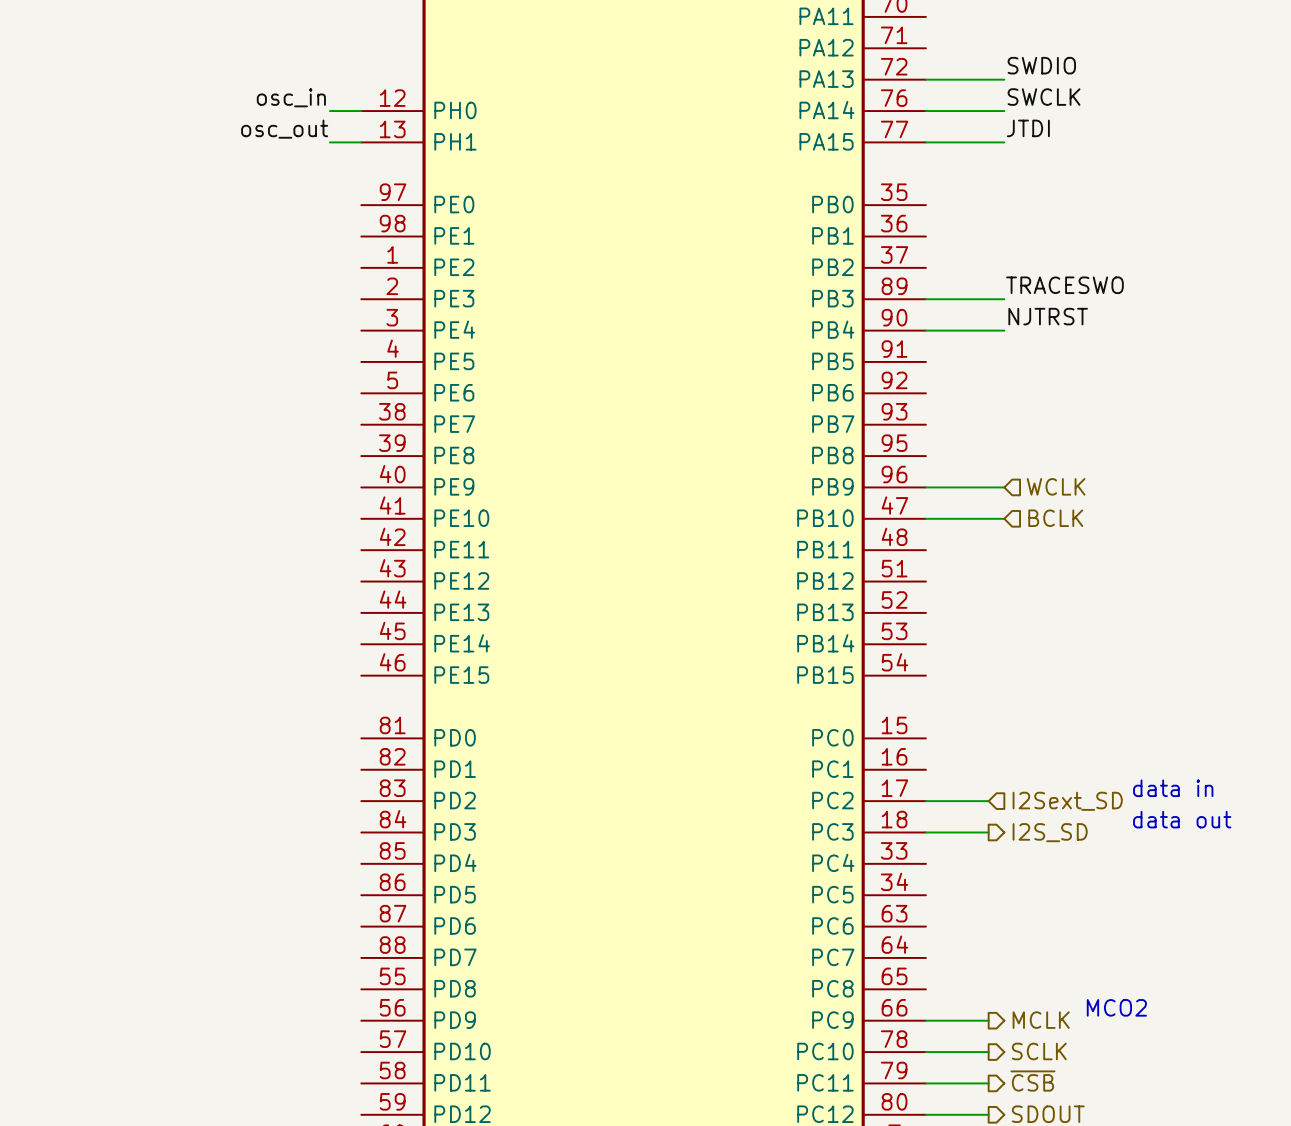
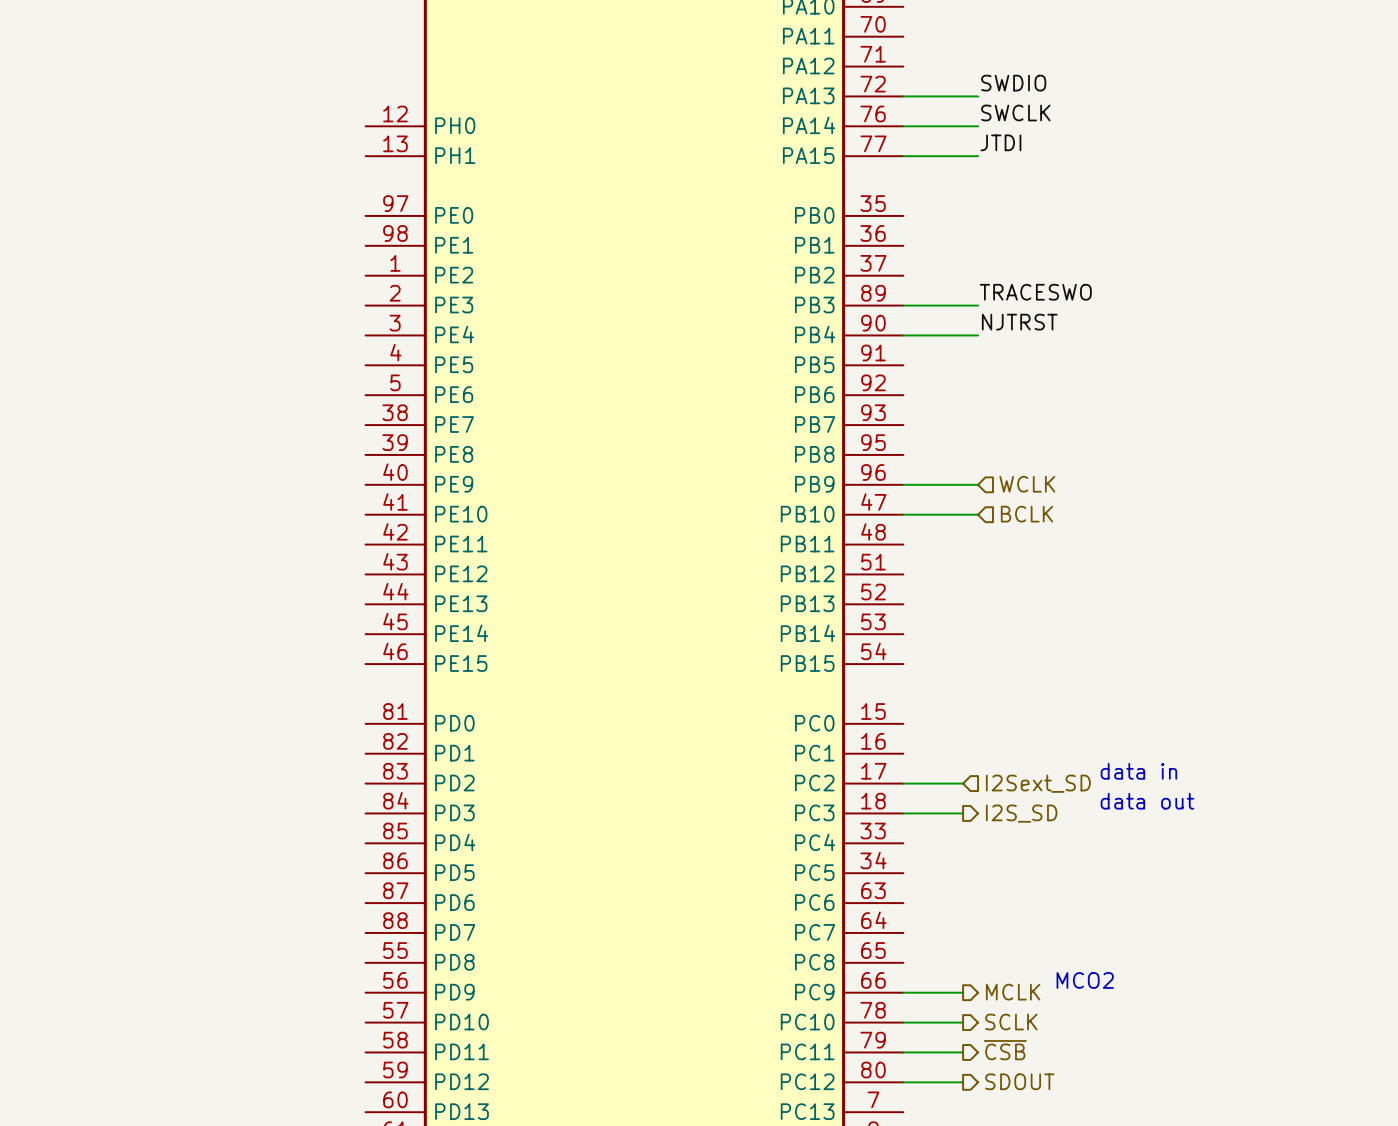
label: osc_in (291, 97) -> none
wire: (329, 111) (361, 111) -> none
label: osc_out (284, 129) -> none
wire: (329, 142) (361, 142) -> none

